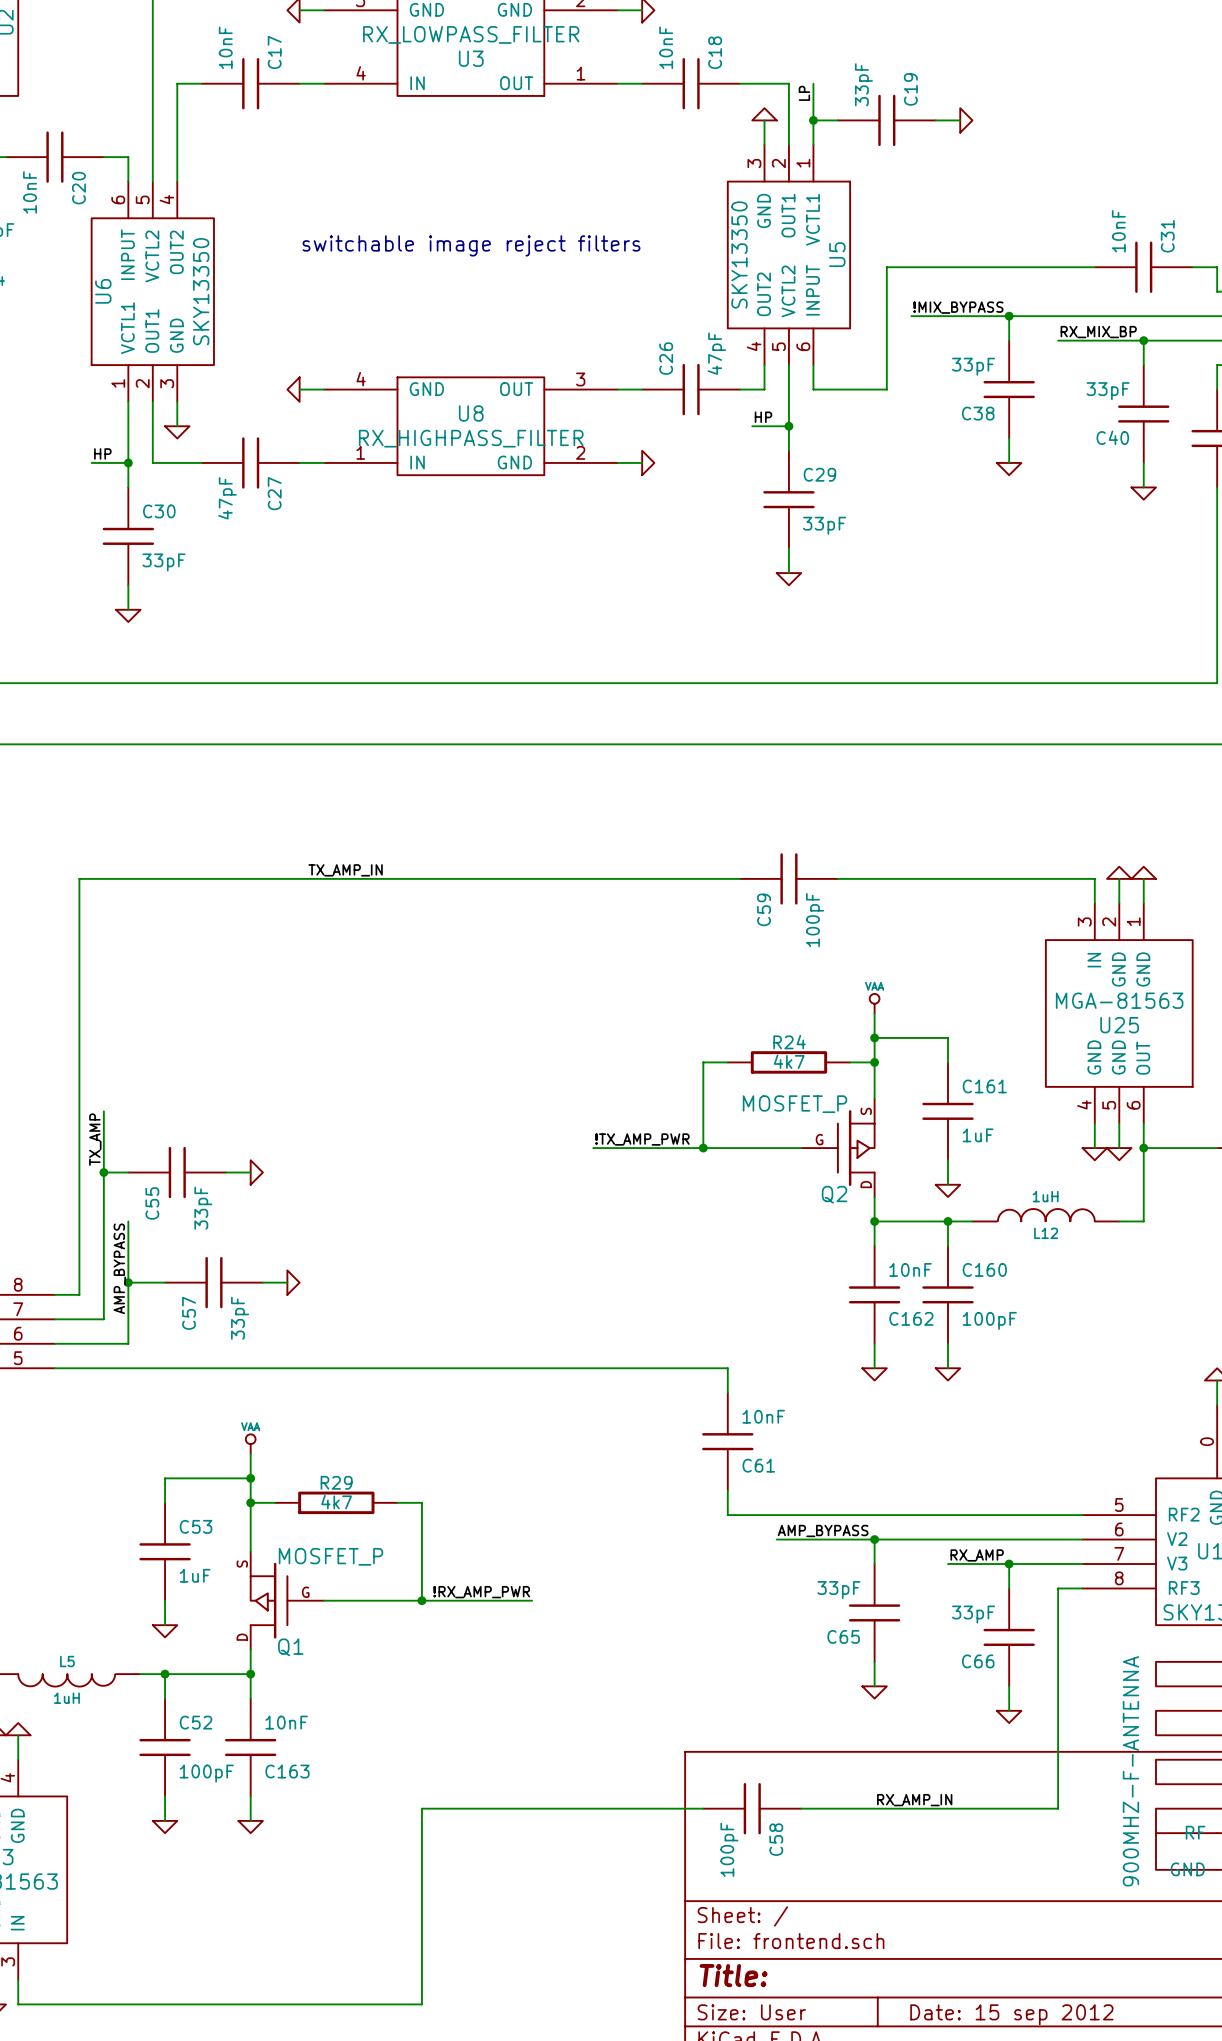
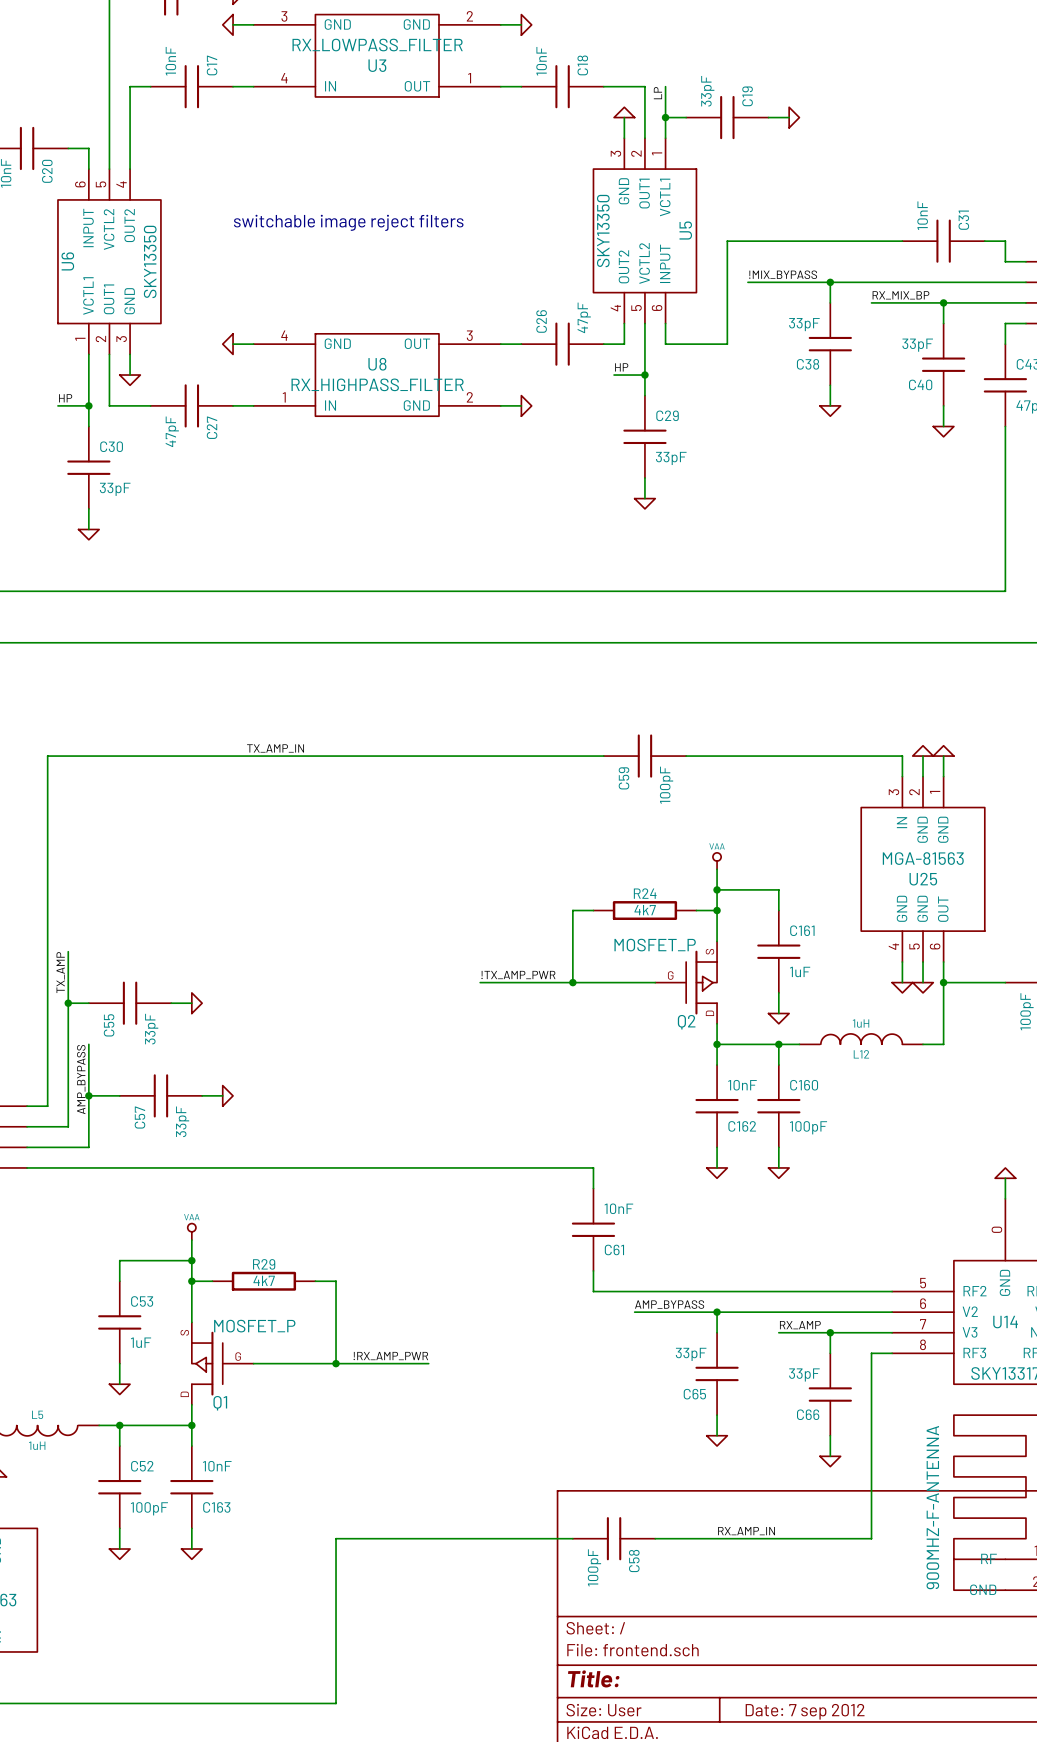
title block: Date: 15 sep 2012 (1011, 2014) -> Date: 7 sep 2012 (805, 1711)

